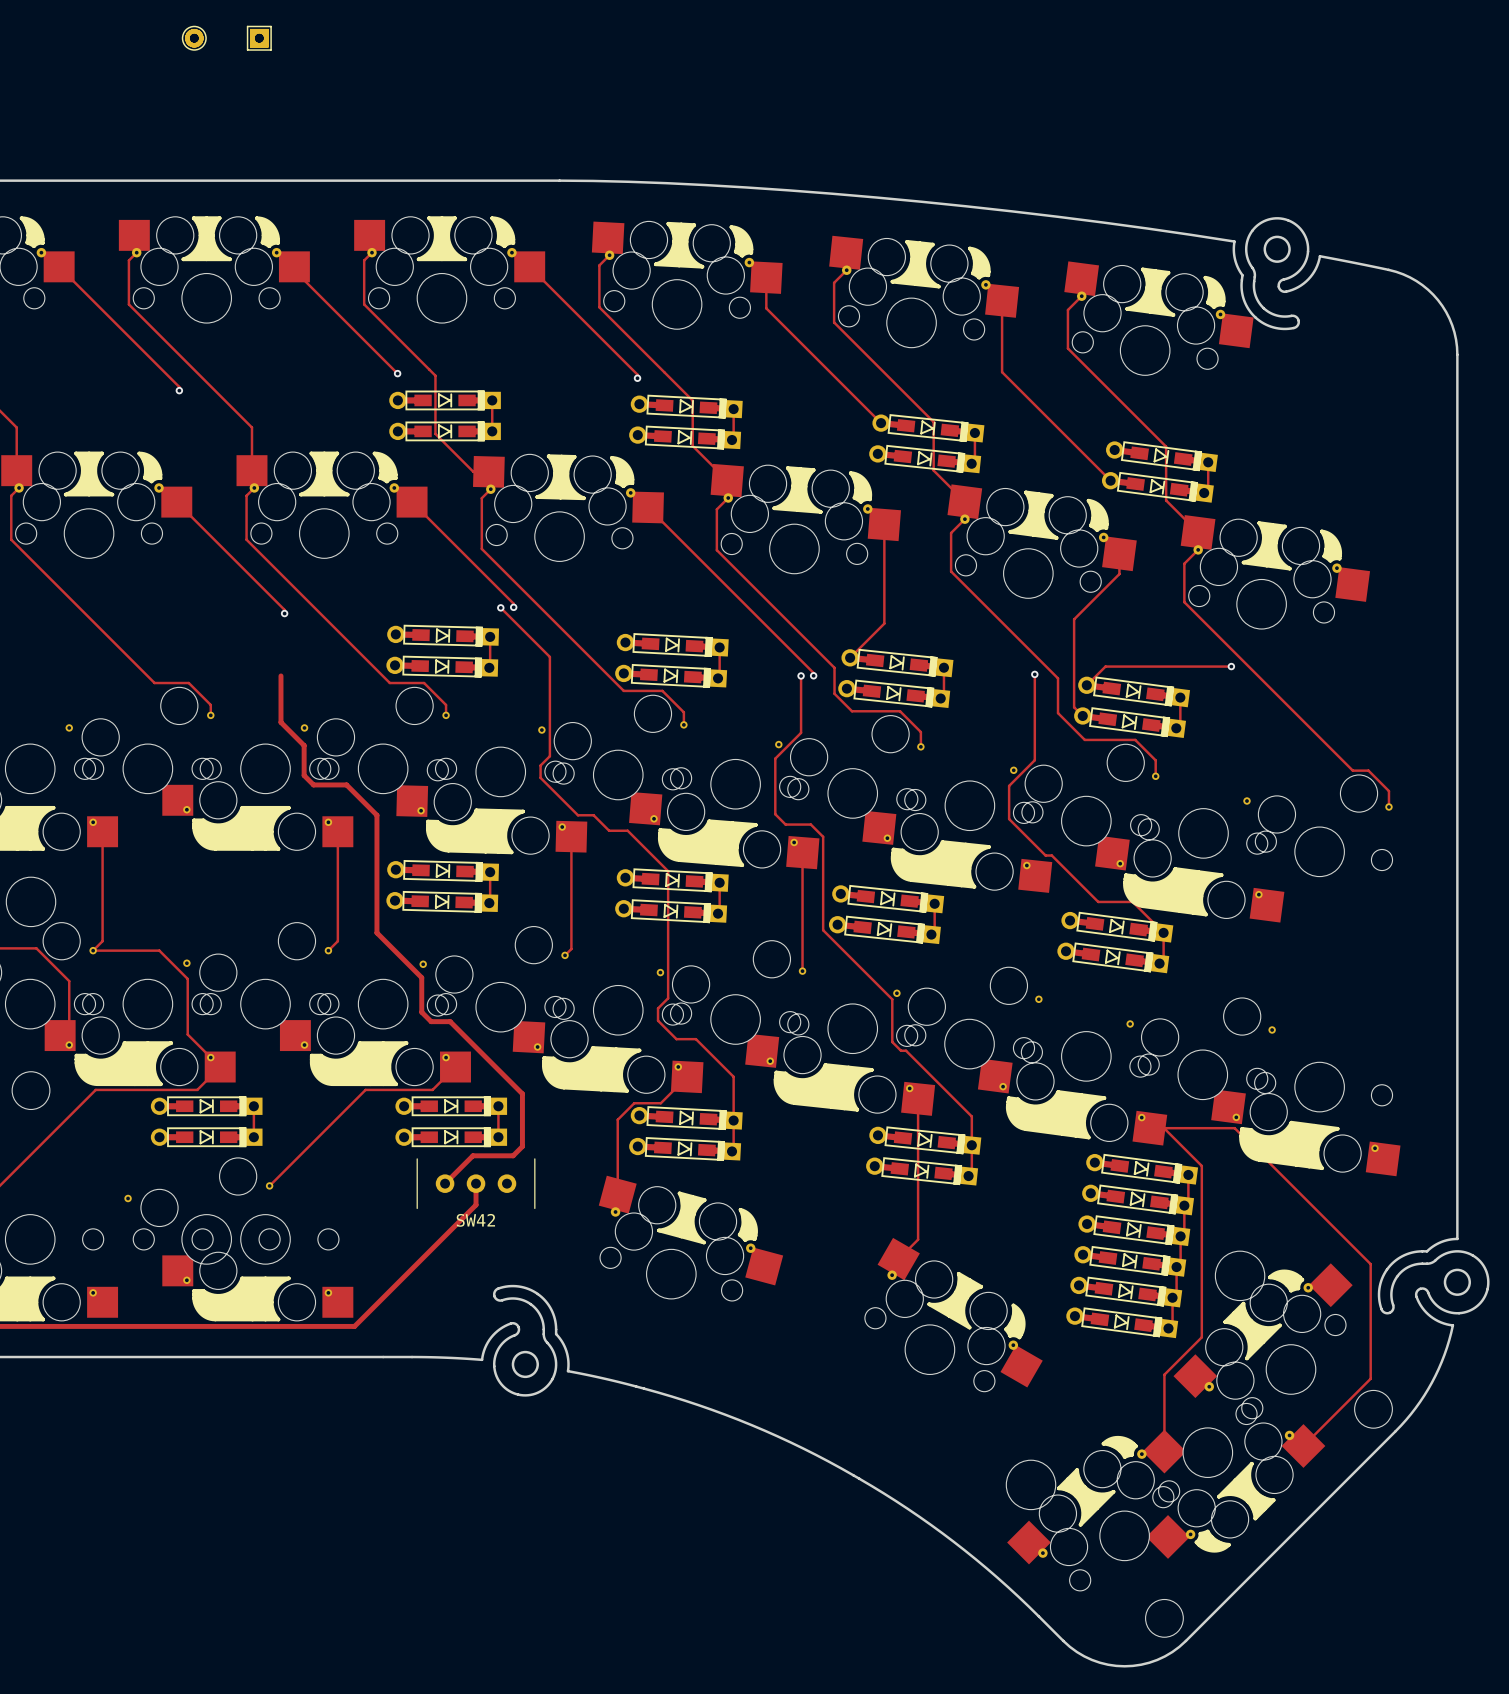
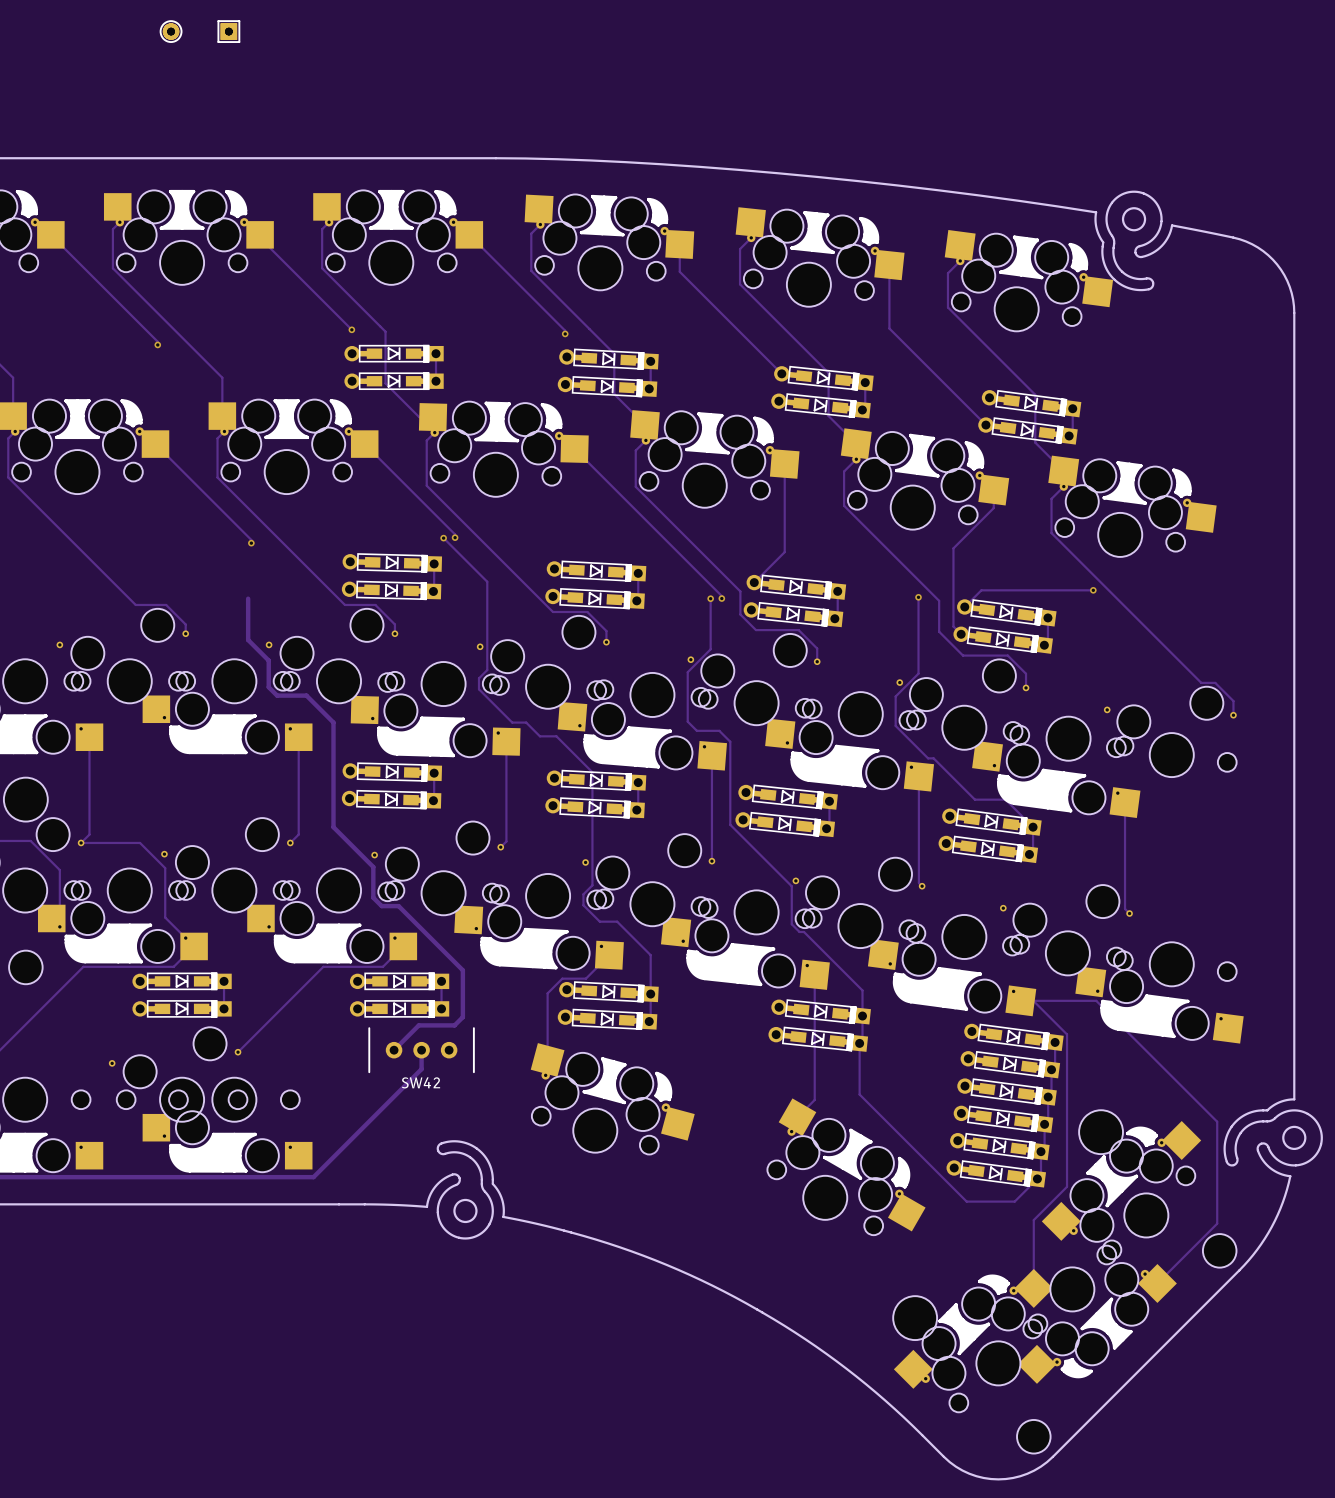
track: none -> (918, 776) (918, 883) (922, 886)
track: none -> (1125, 802) (1125, 908) (1129, 913)
track: none -> (859, 1043) (859, 1094) (966, 1201) (1014, 1201) (1037, 1178)

